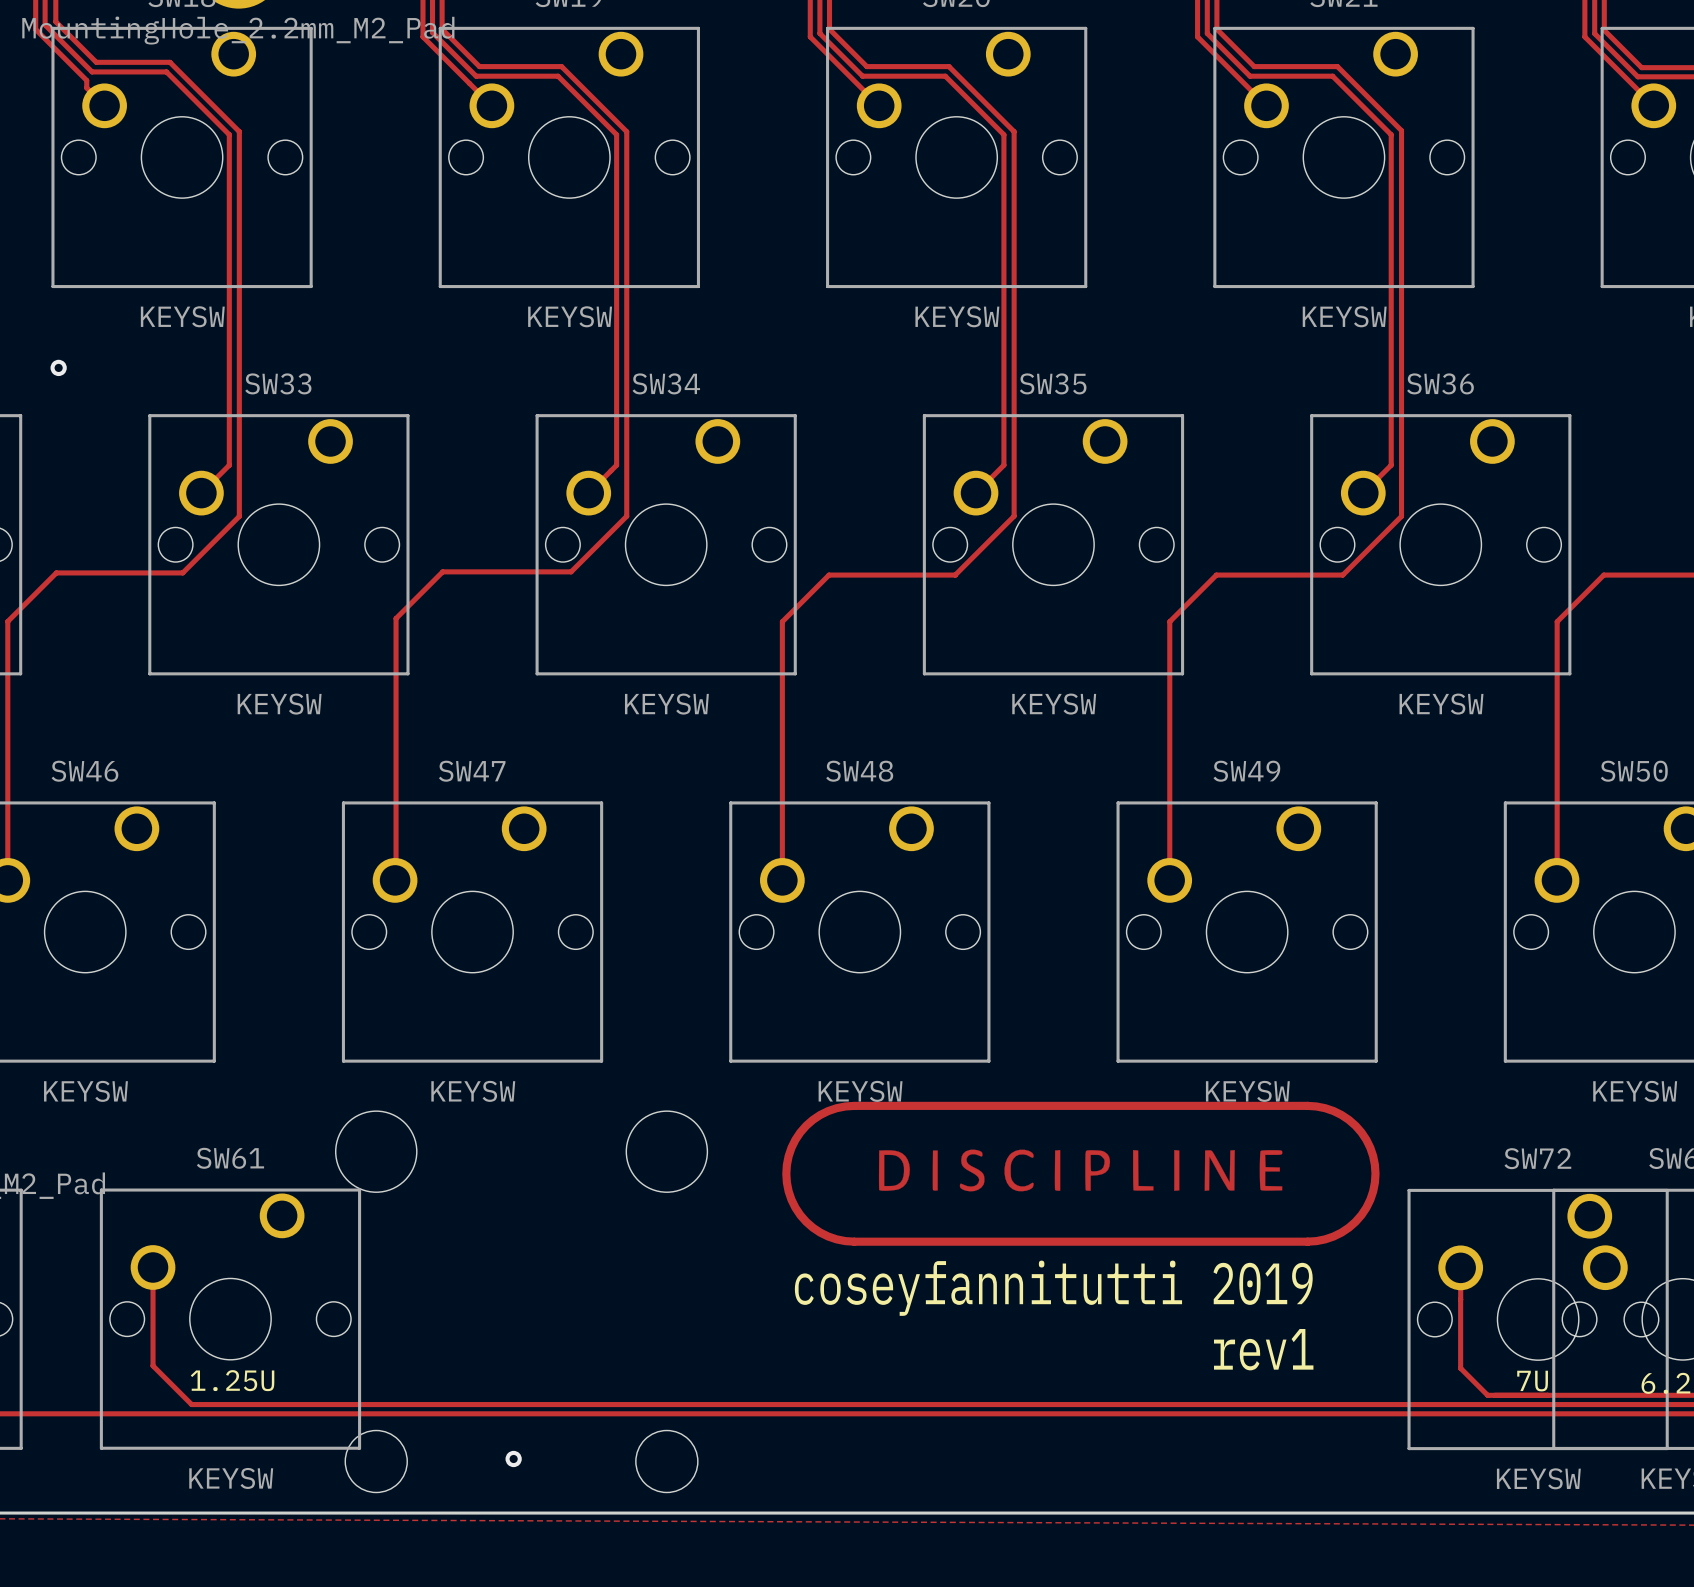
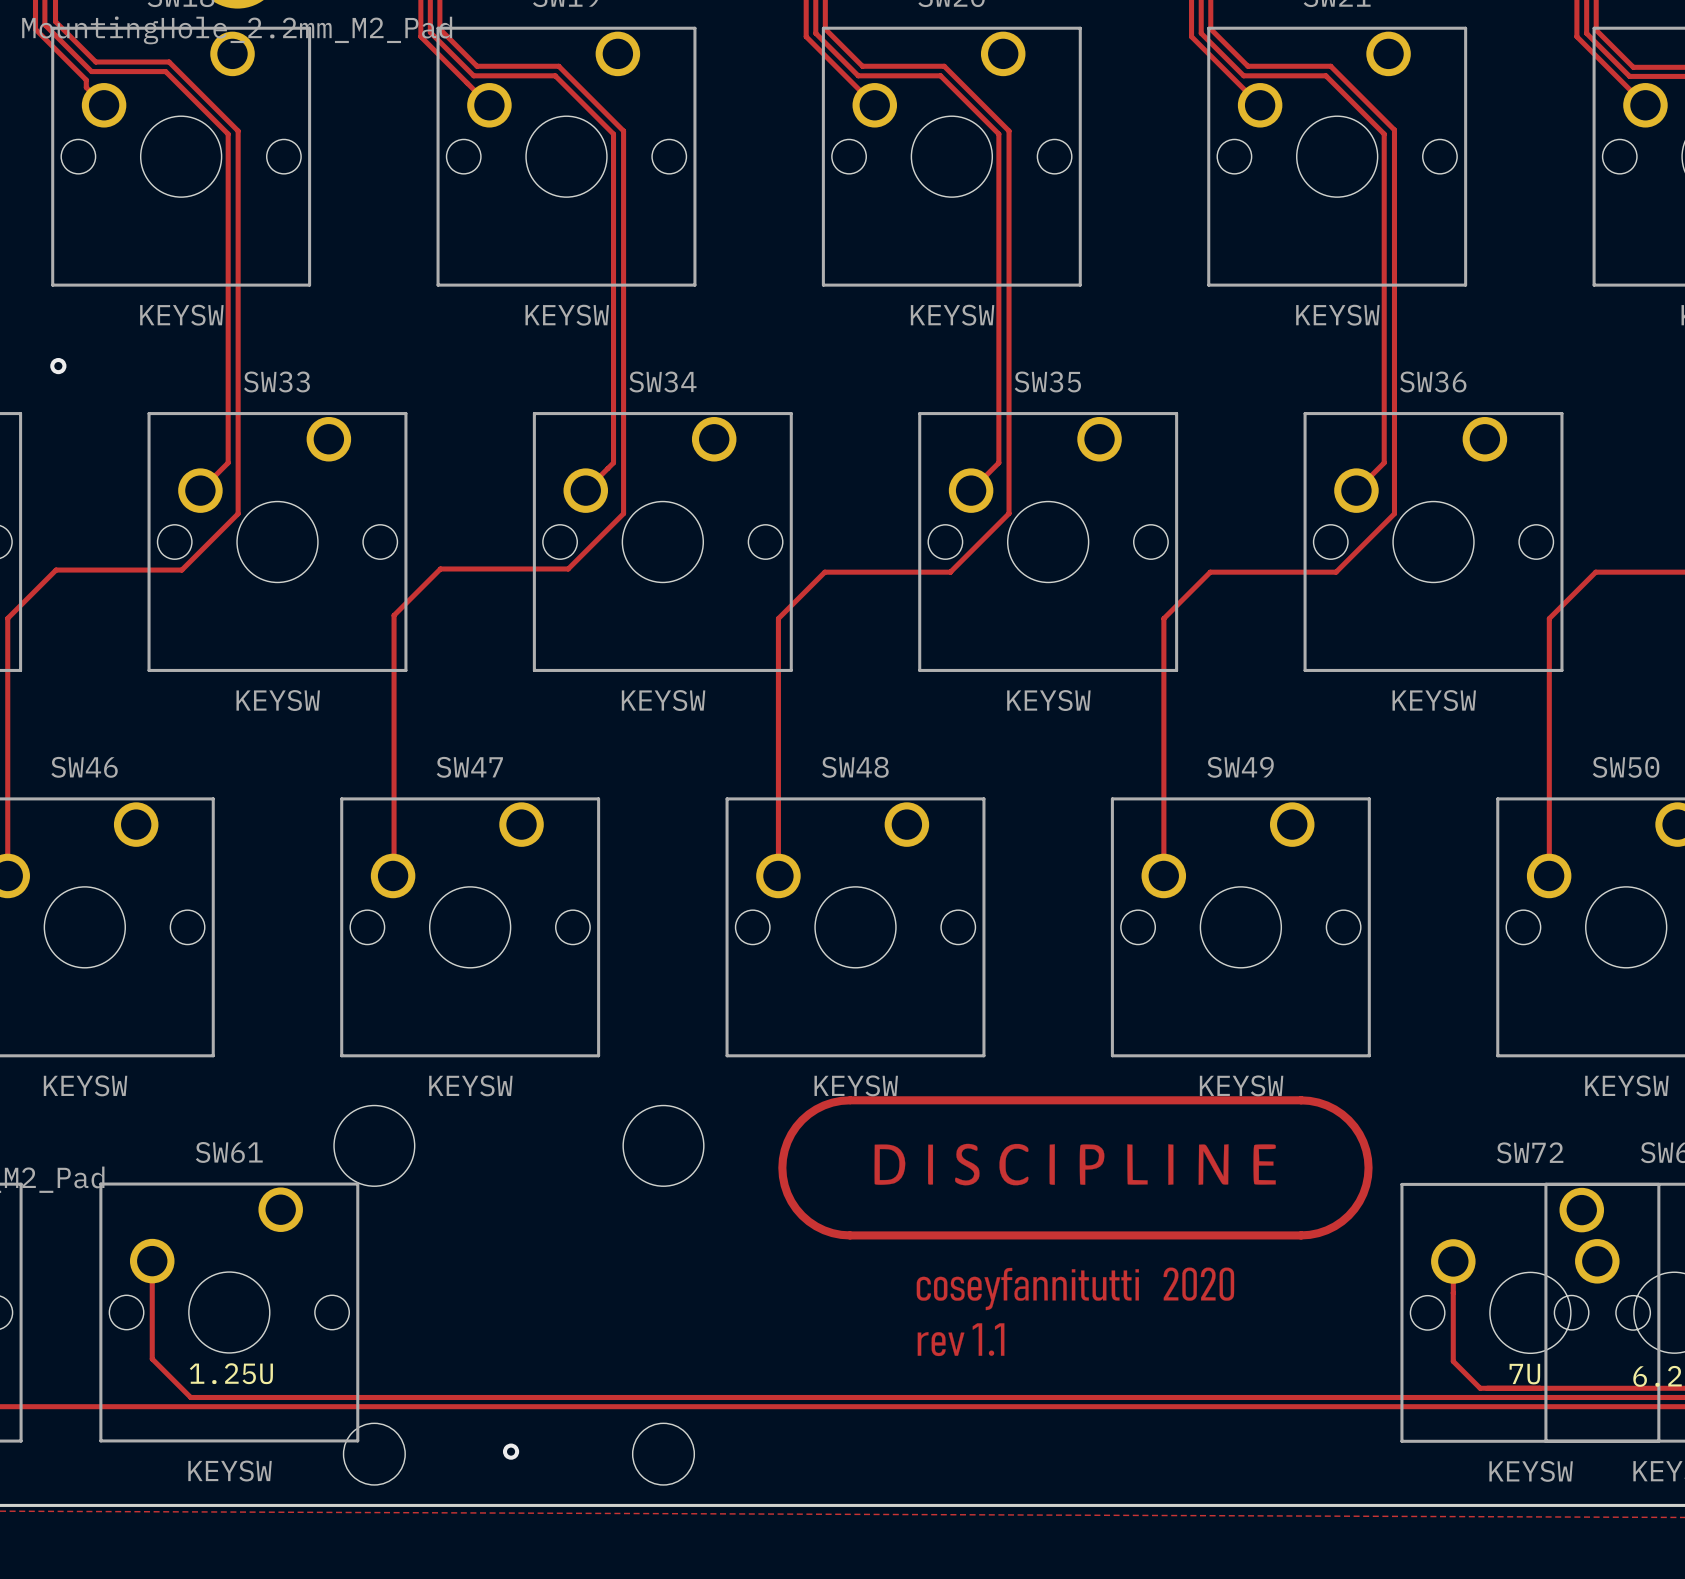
drawing: none -> [916, 1267, 1235, 1357]
text: coseyfannitutti 2019 (1053, 1288) -> none
text: rev1 (1263, 1349) -> none

